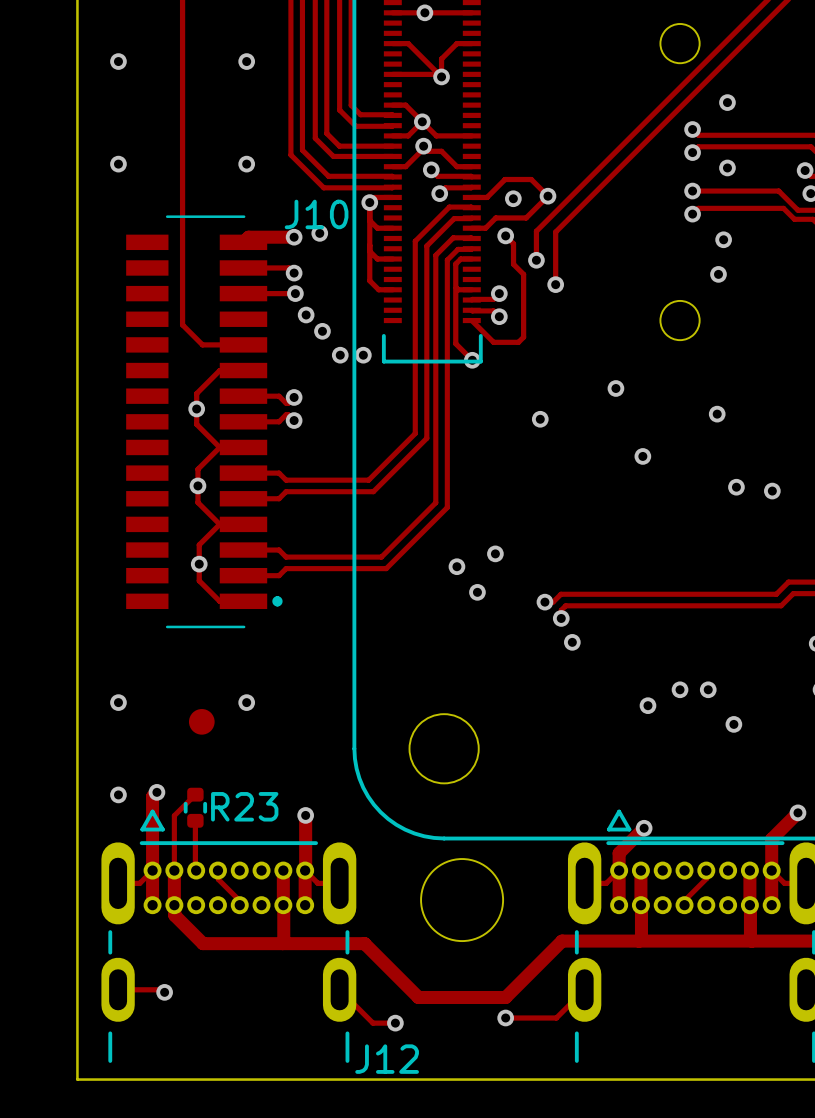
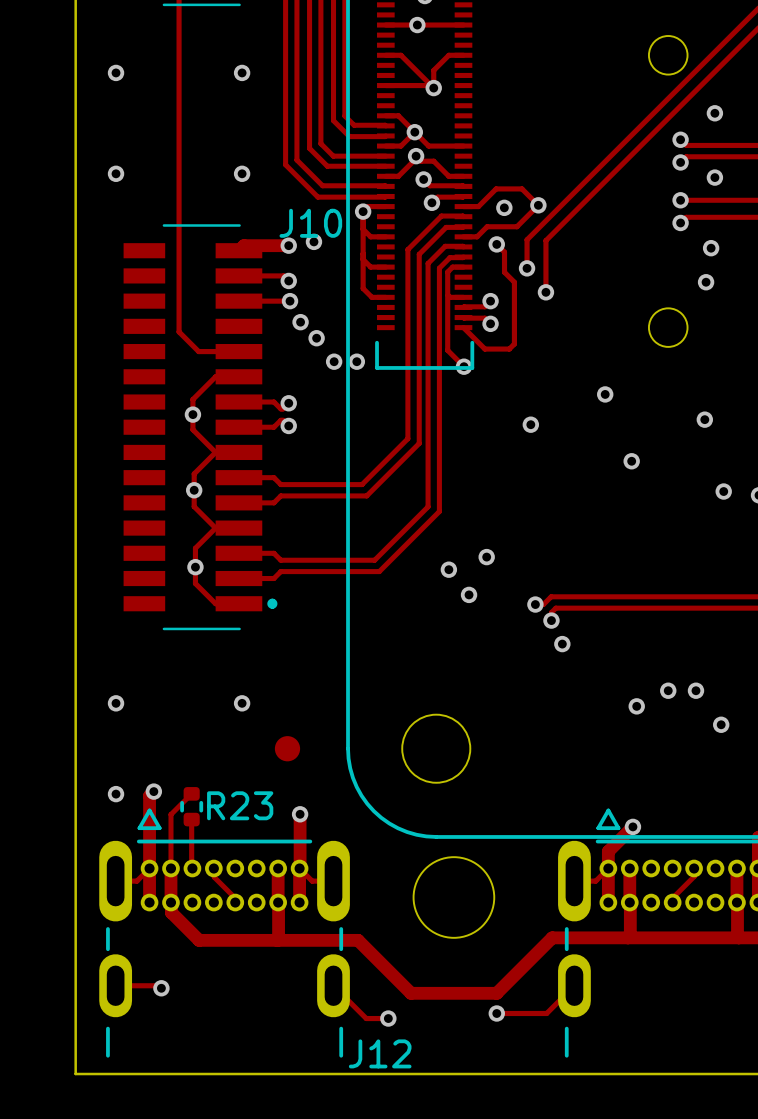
part position: (201, 721) -> (287, 748)

